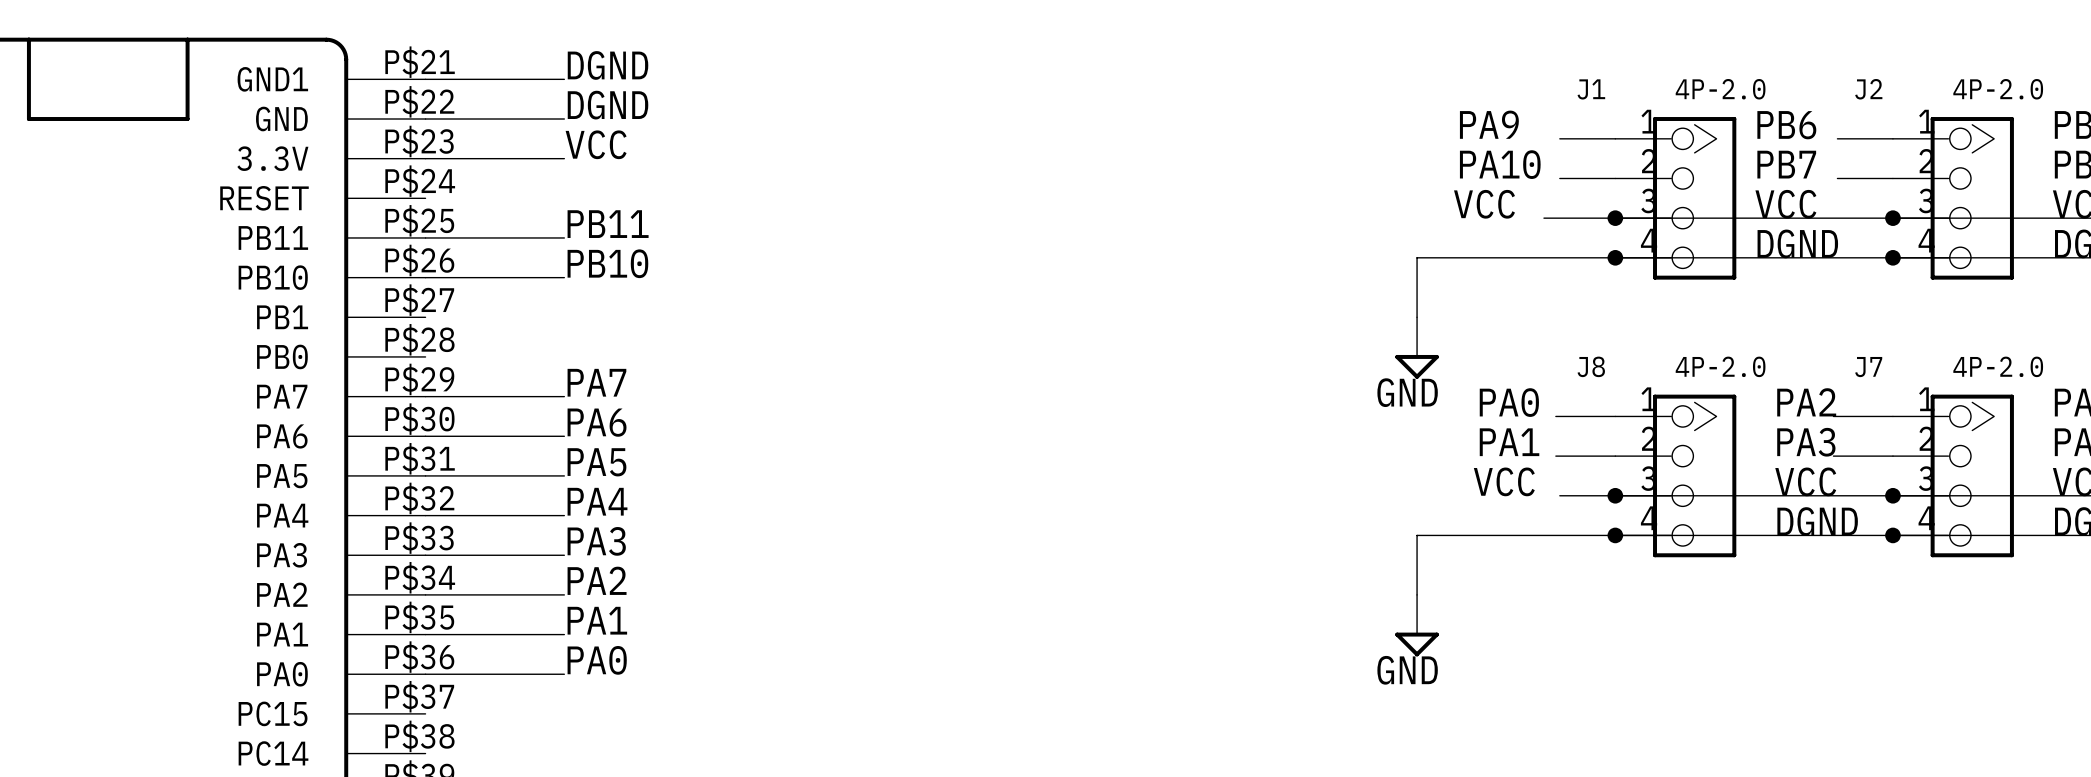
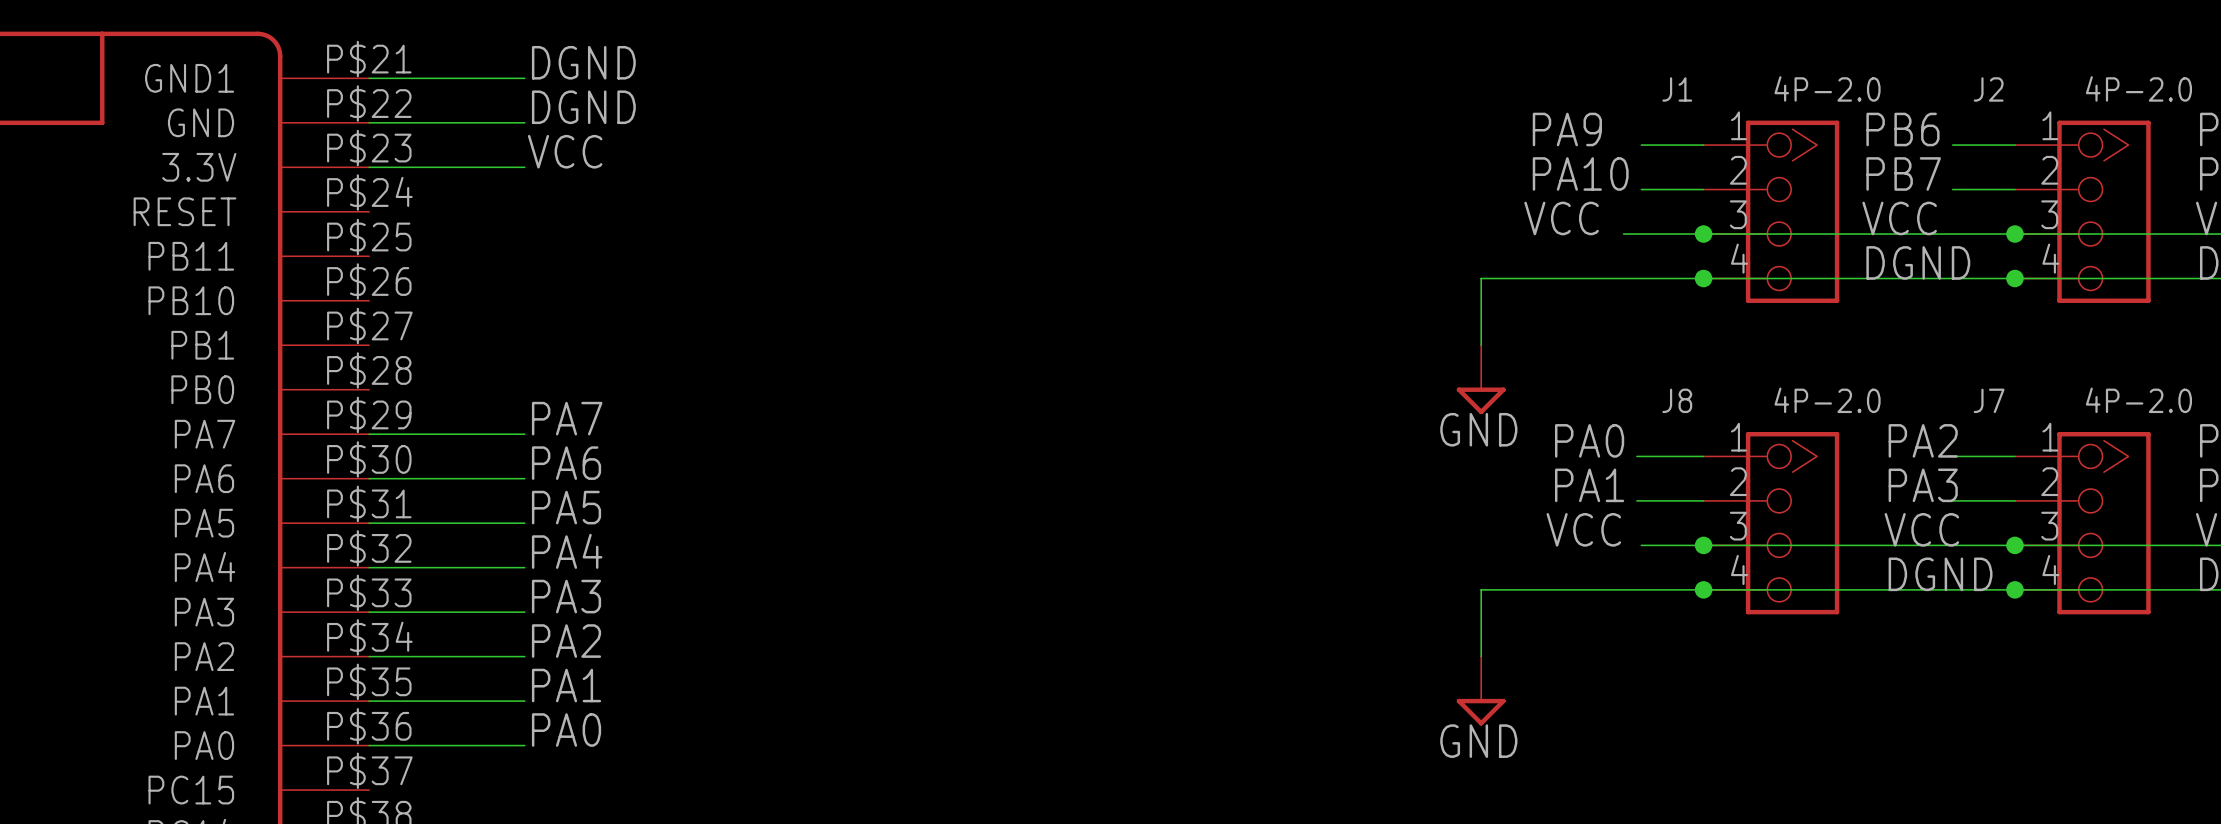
label: PB11 (608, 224) -> none
wire: (425, 237) (564, 237) -> none
label: PB10 (607, 263) -> none
wire: (425, 277) (564, 277) -> none

